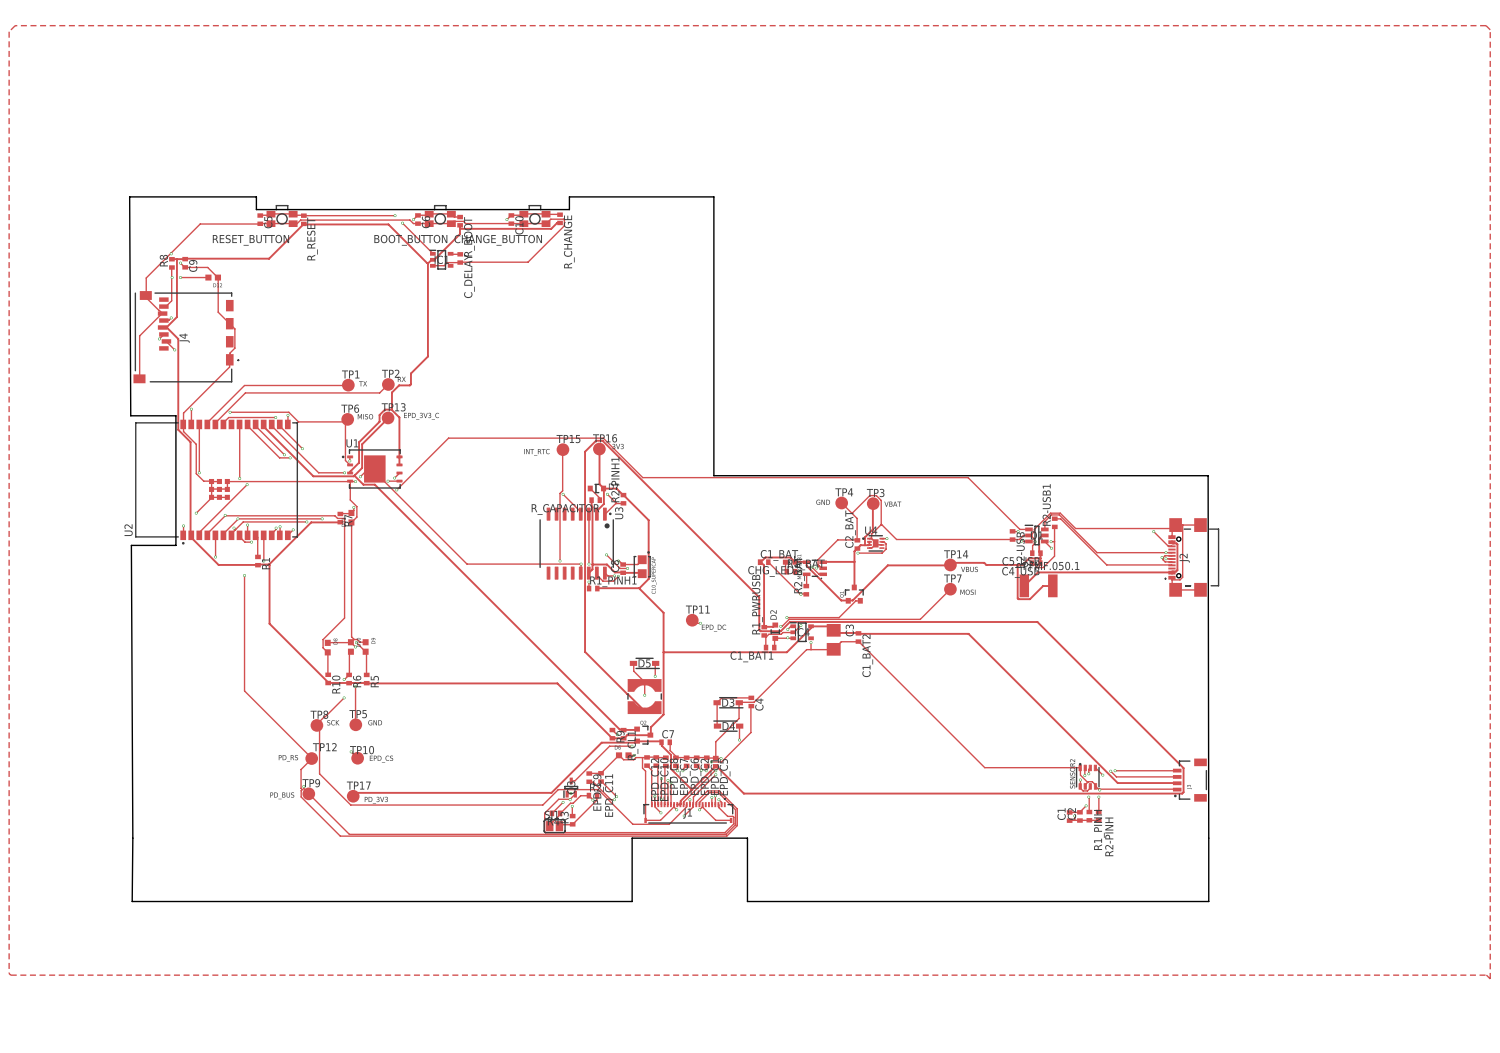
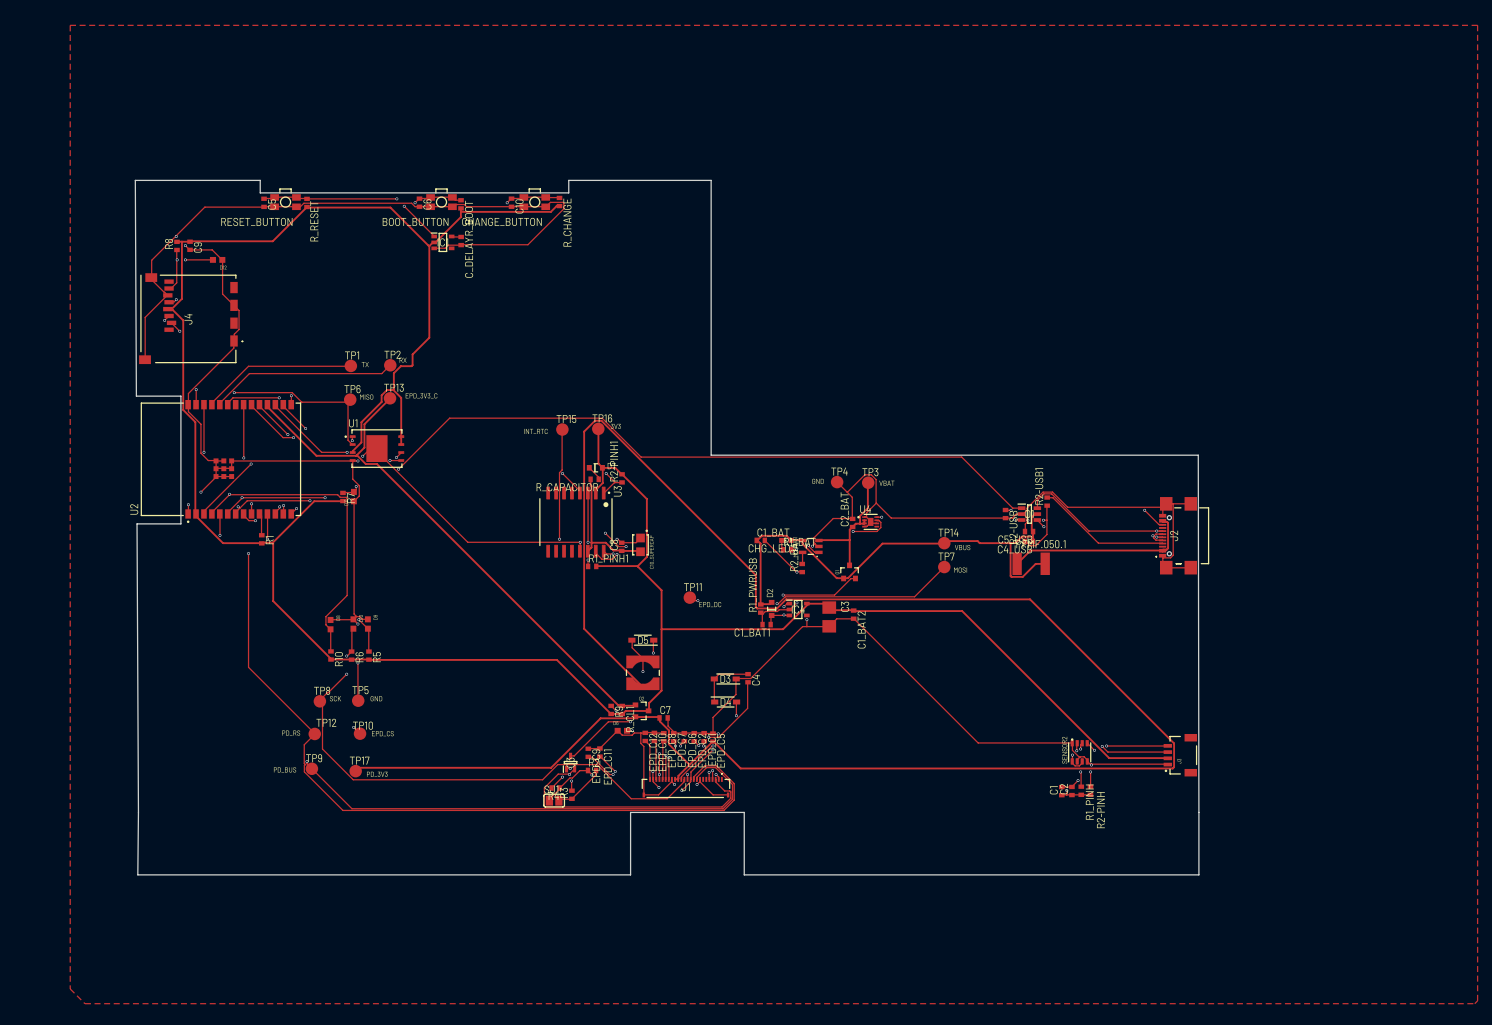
zone outline: (15, 25) (1486, 25) (1490, 29) (1490, 978) (1486, 975) (10, 975) (9, 973) (9, 31) (15, 25) -> (70, 25) (70, 988) (84, 1003) (1474, 1003) (1477, 1000) (1477, 25) (70, 25)

